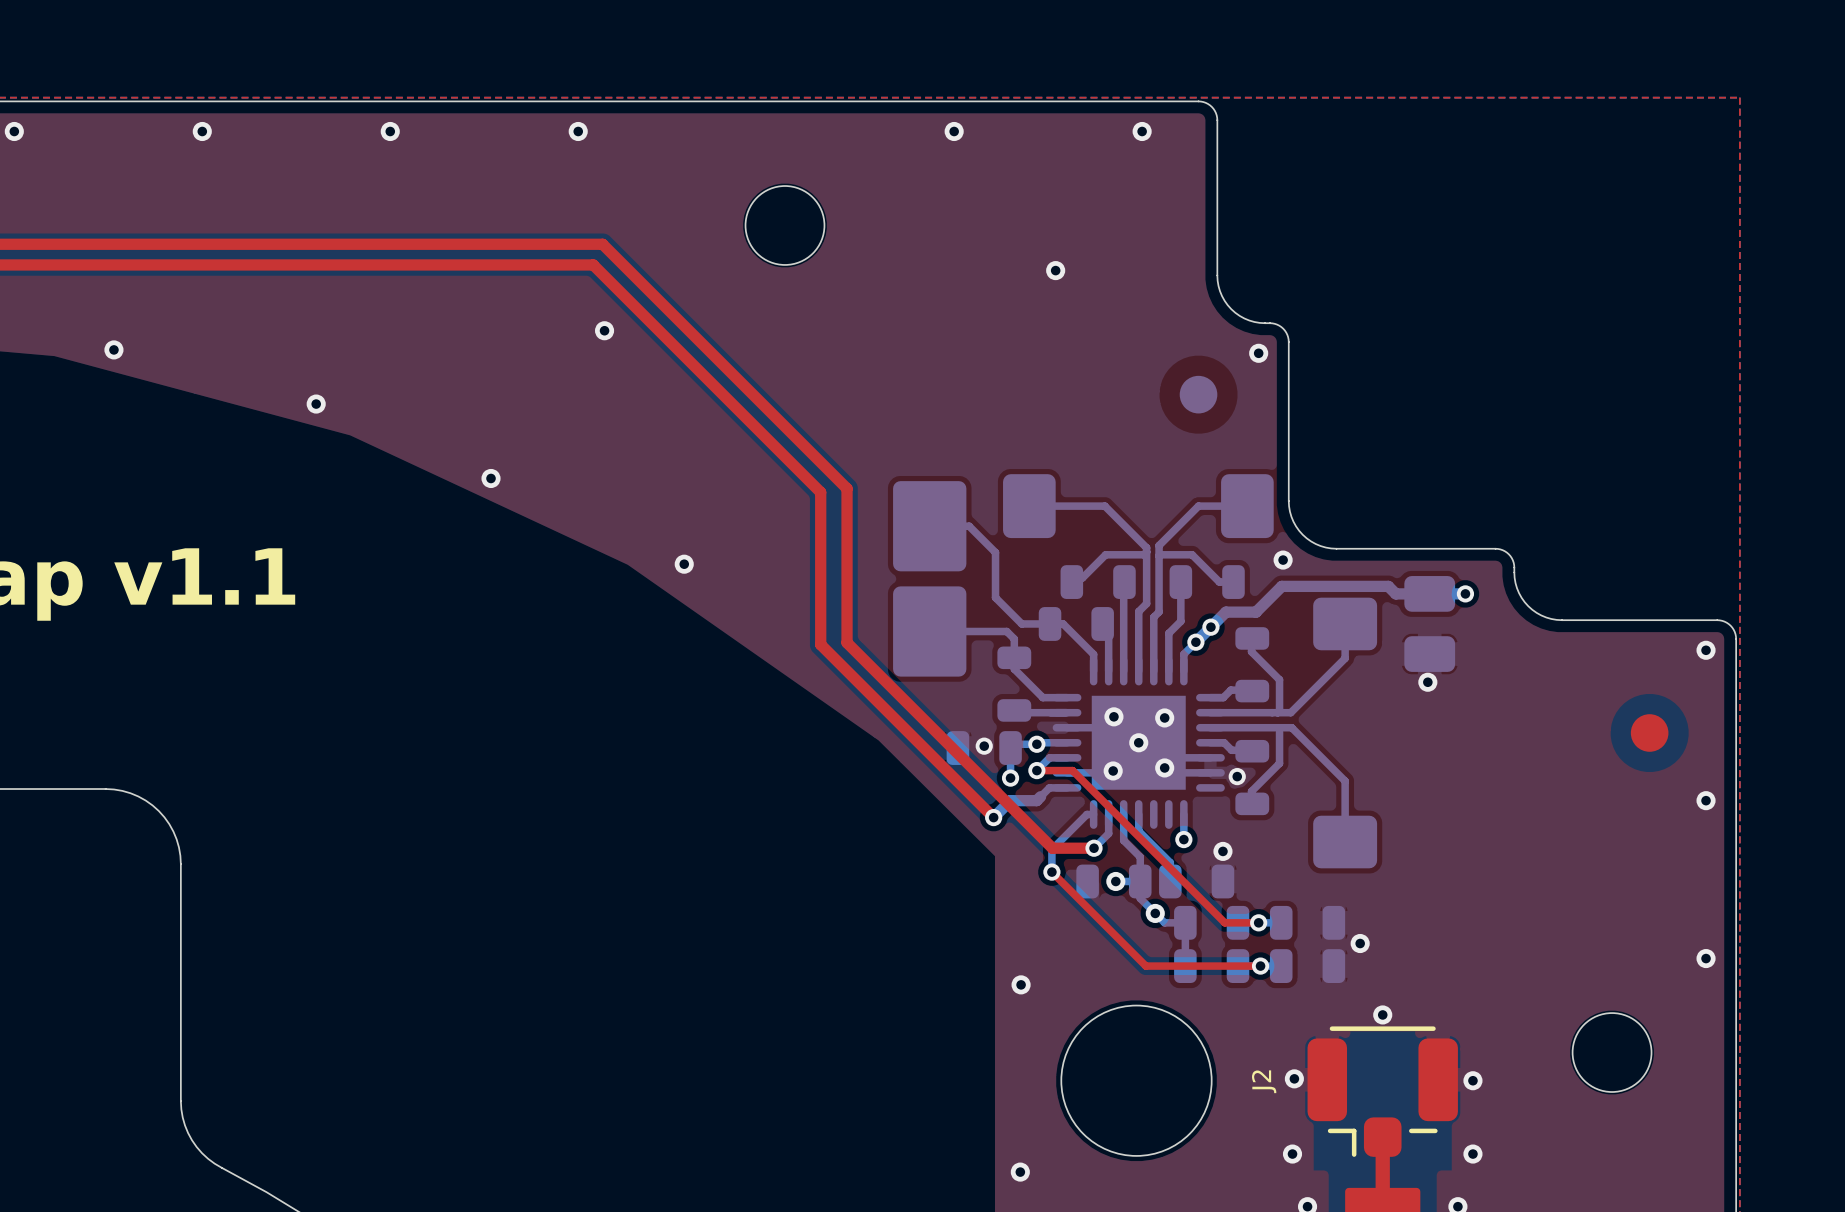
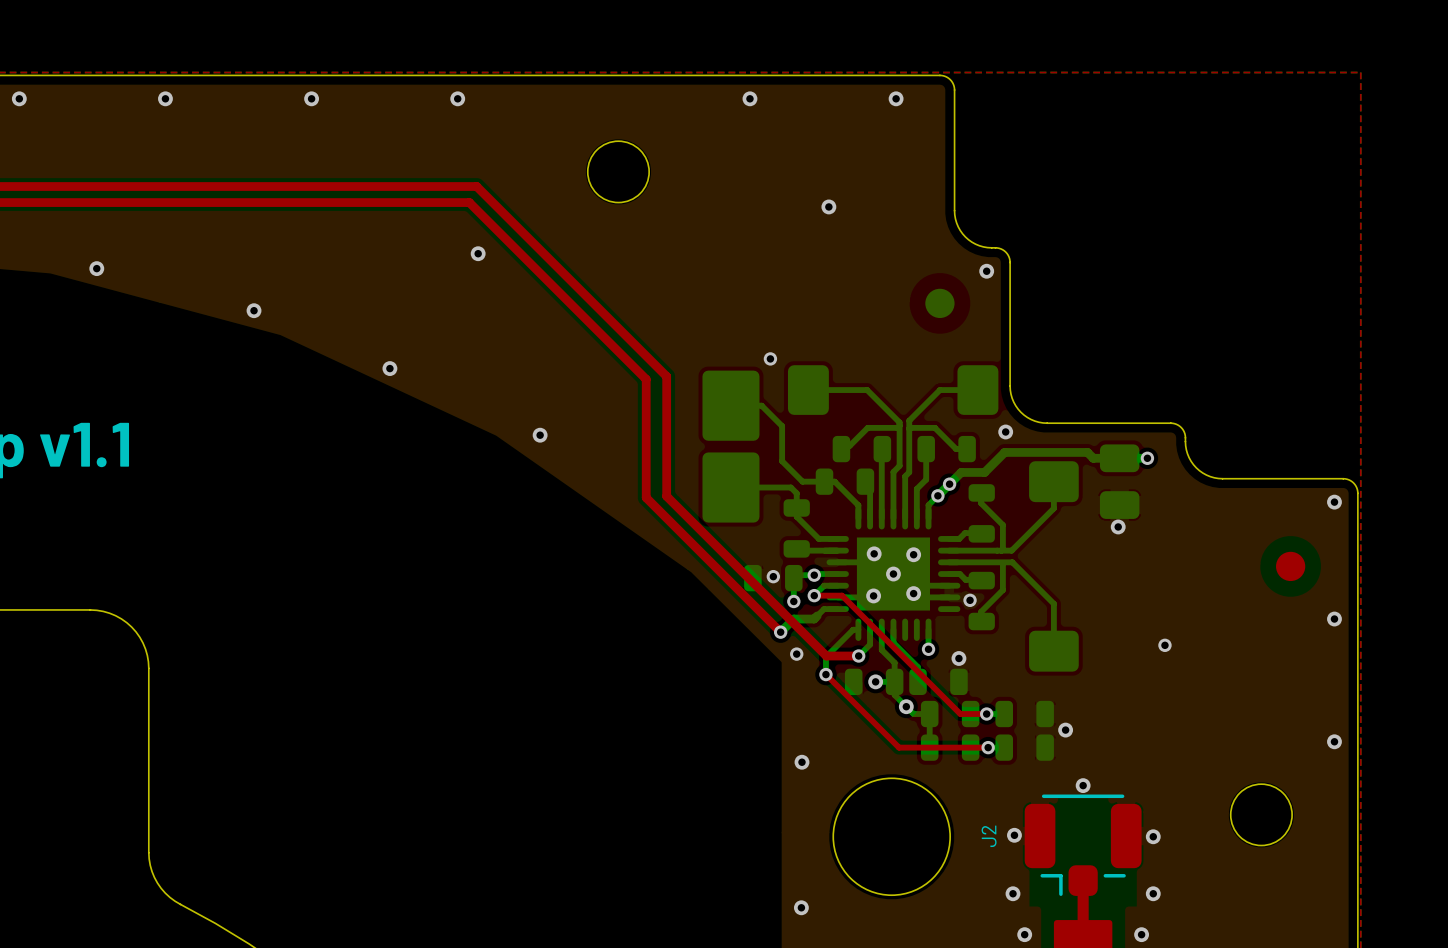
via: none -> (770, 358)
via: none -> (1164, 645)
via: none -> (796, 654)

